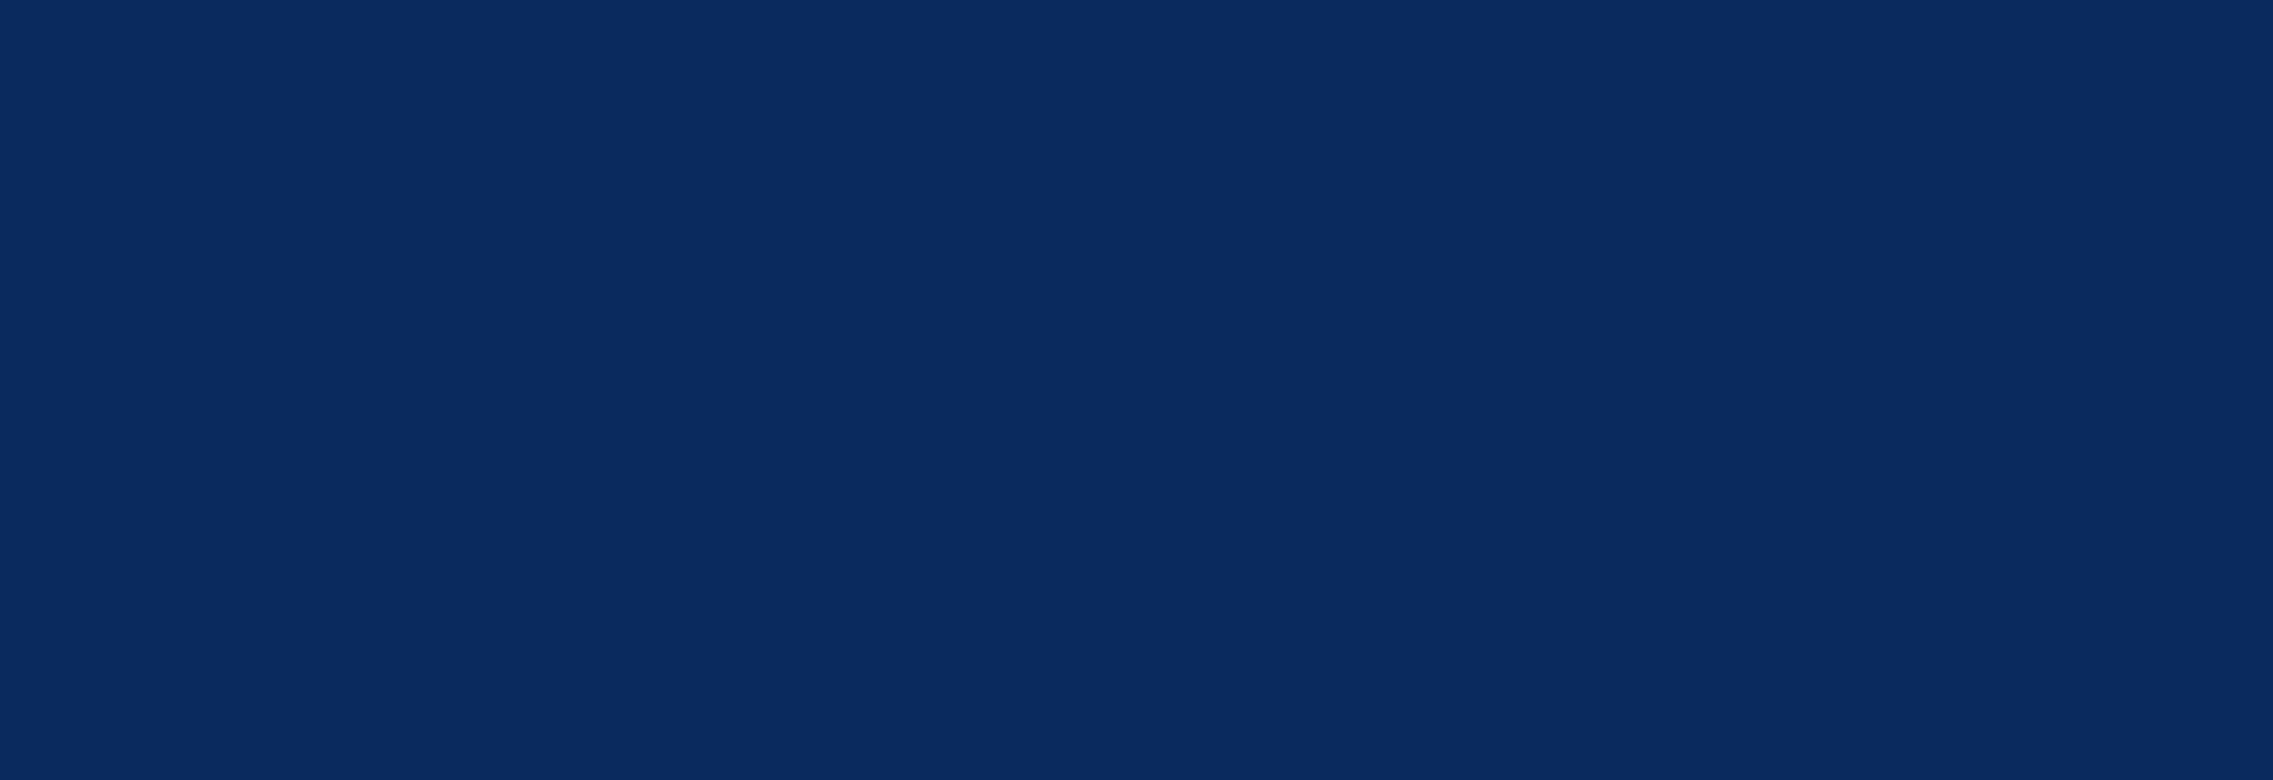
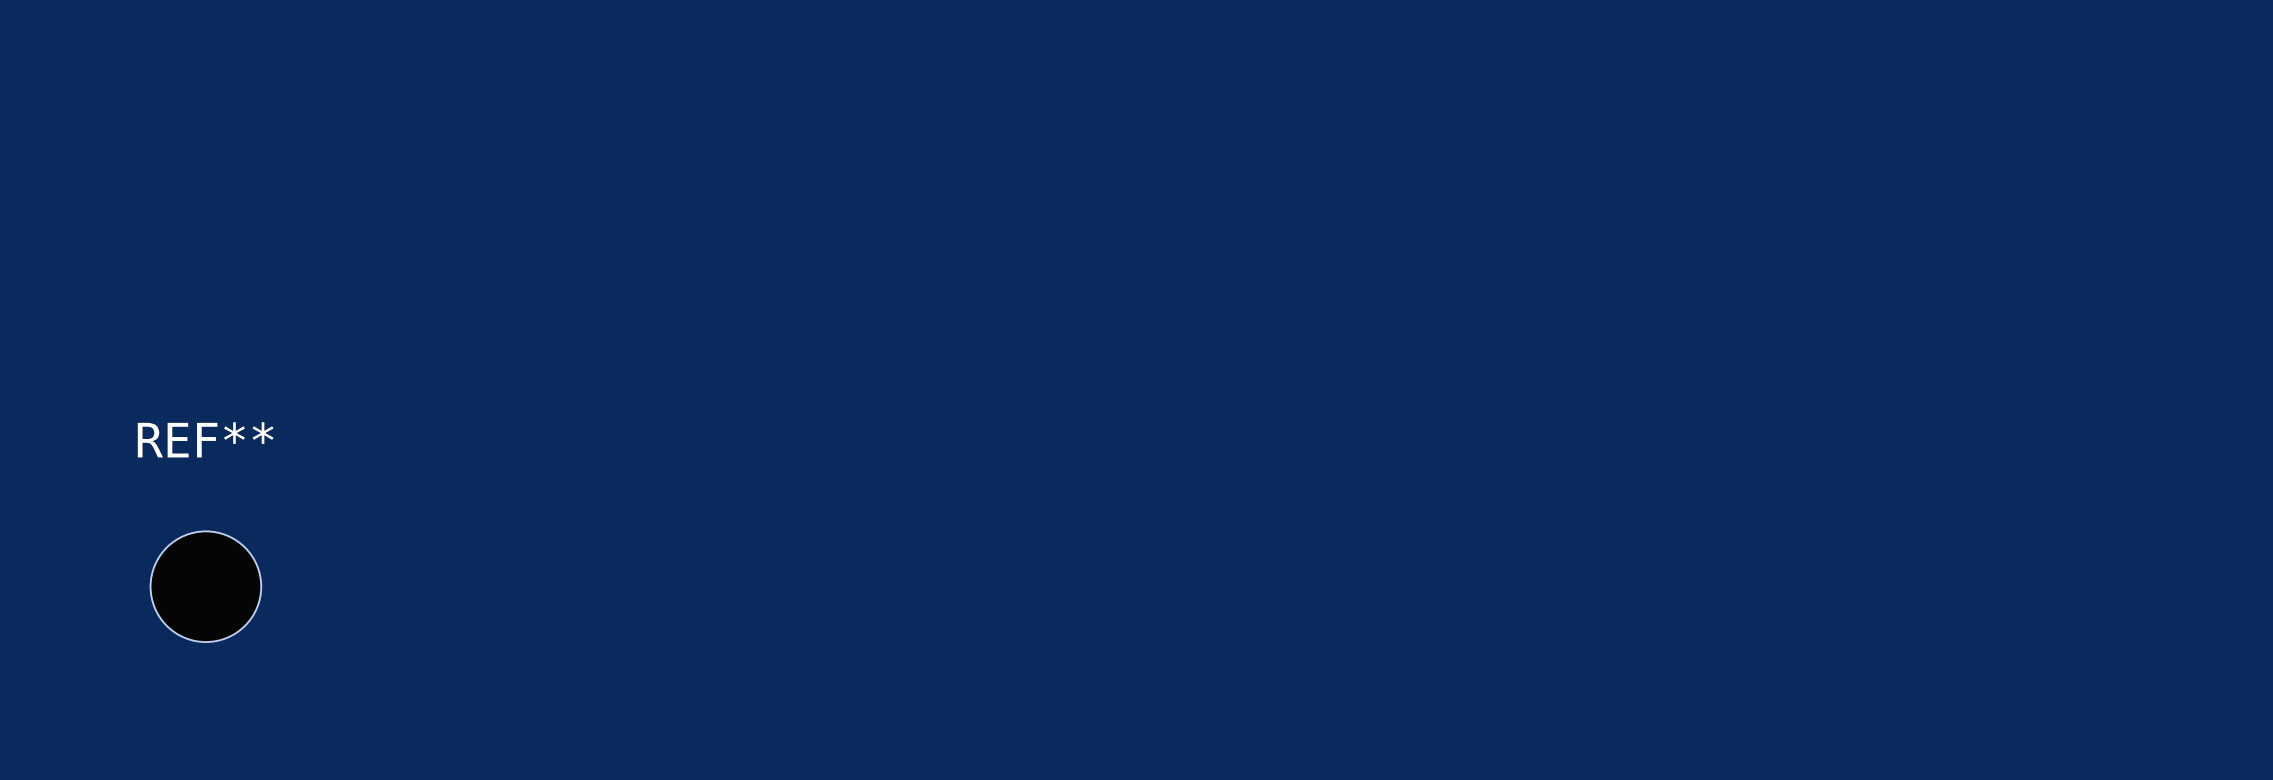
REF**: none -> (205, 586)

